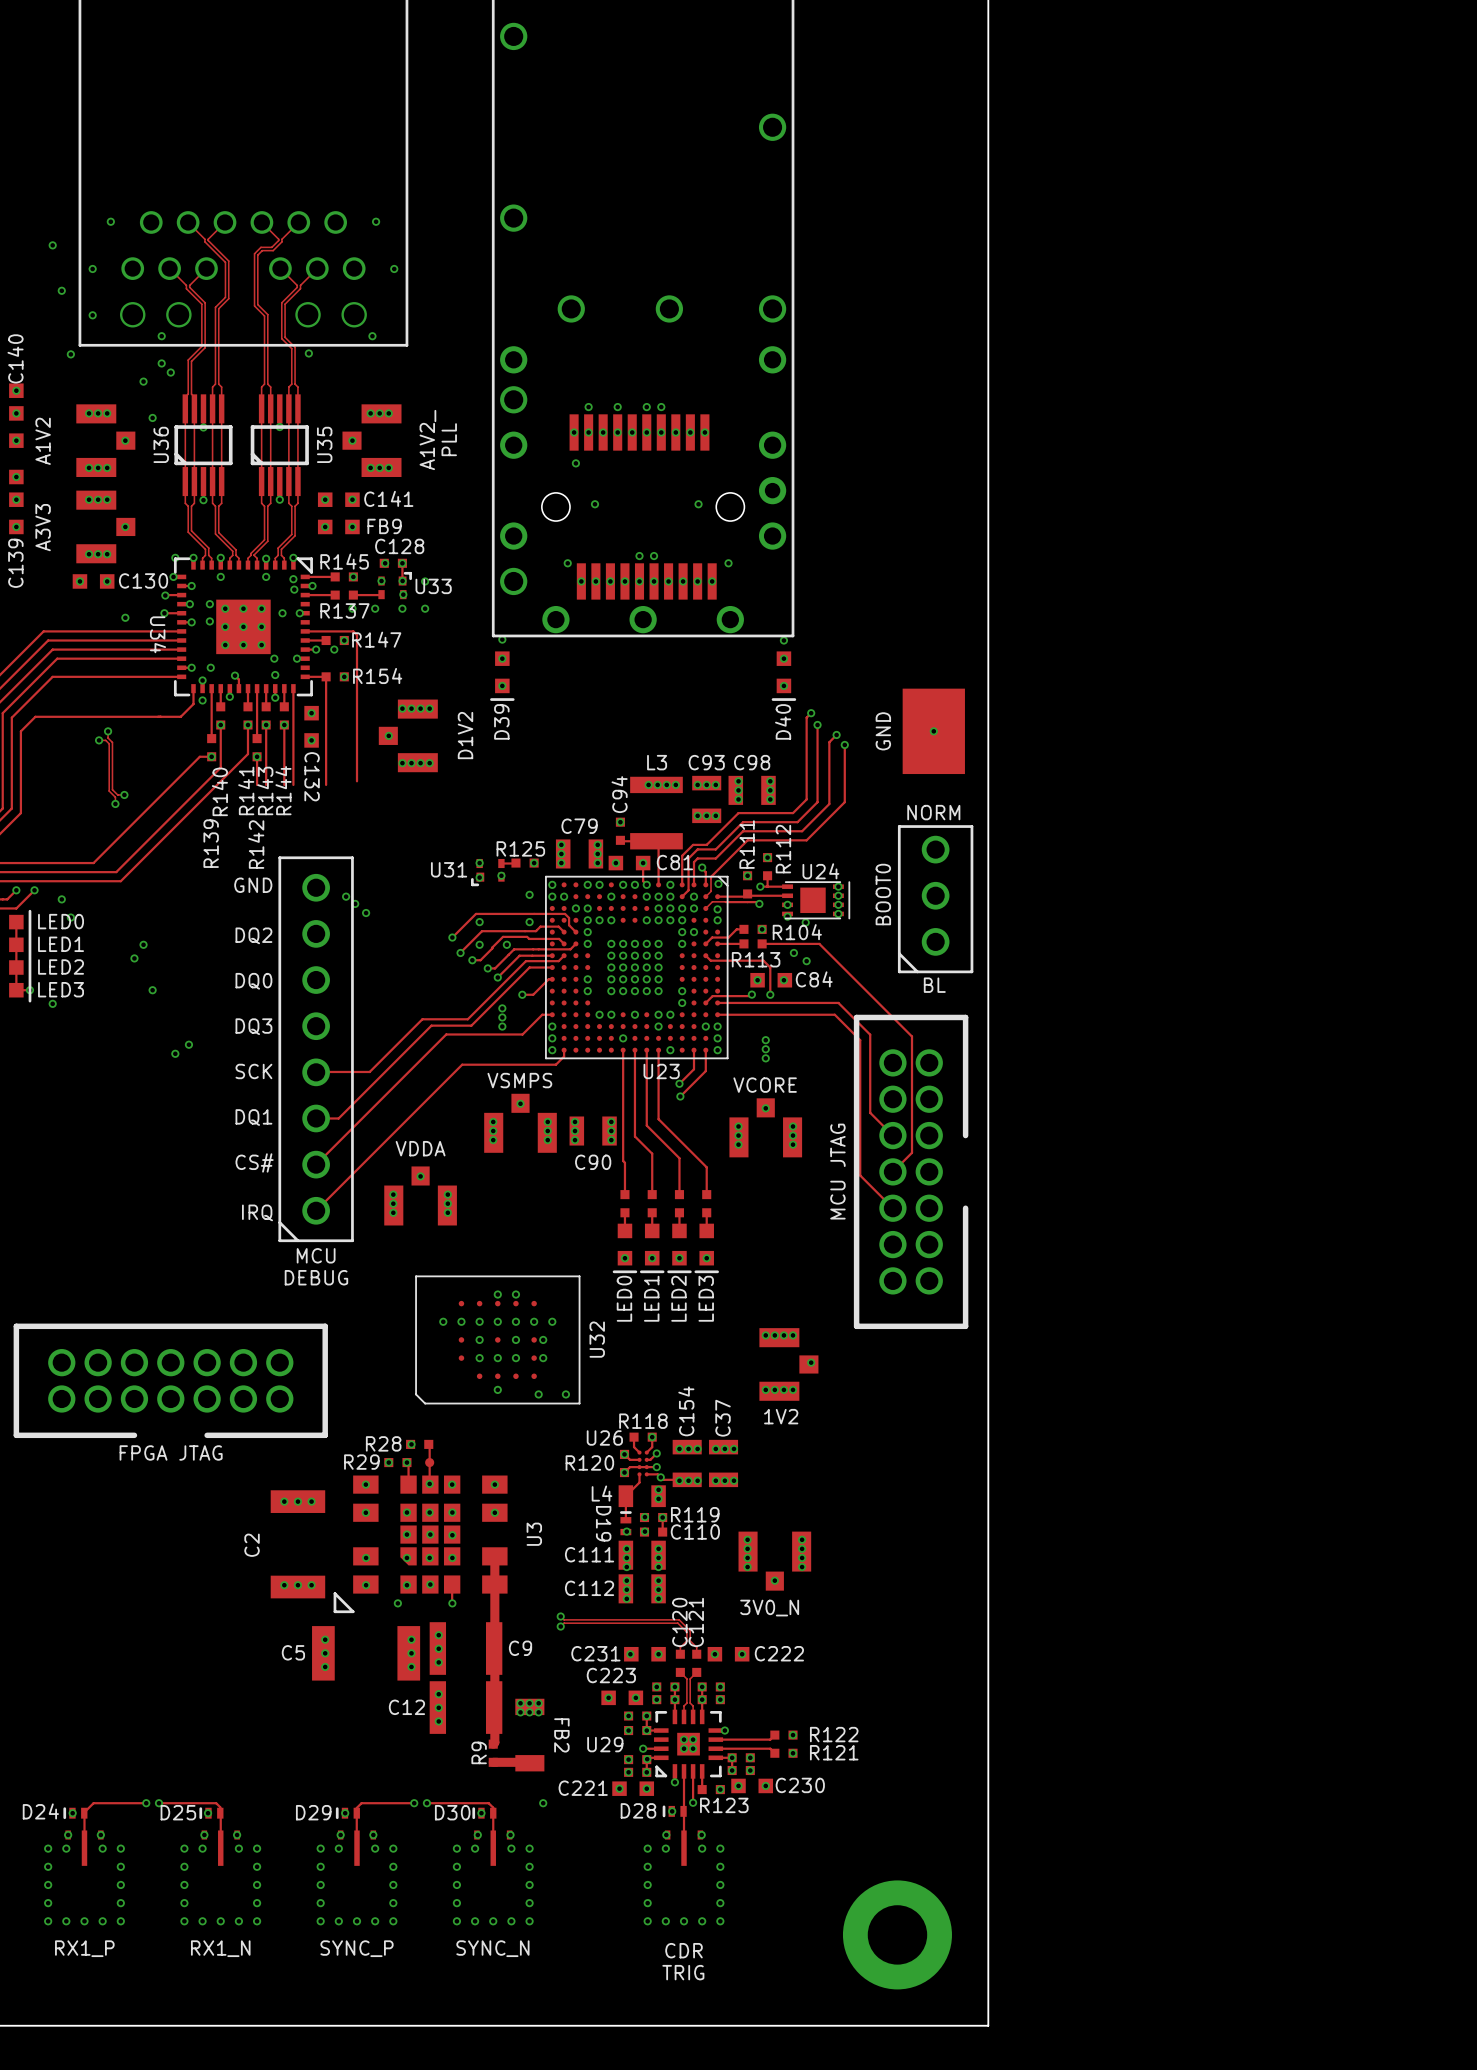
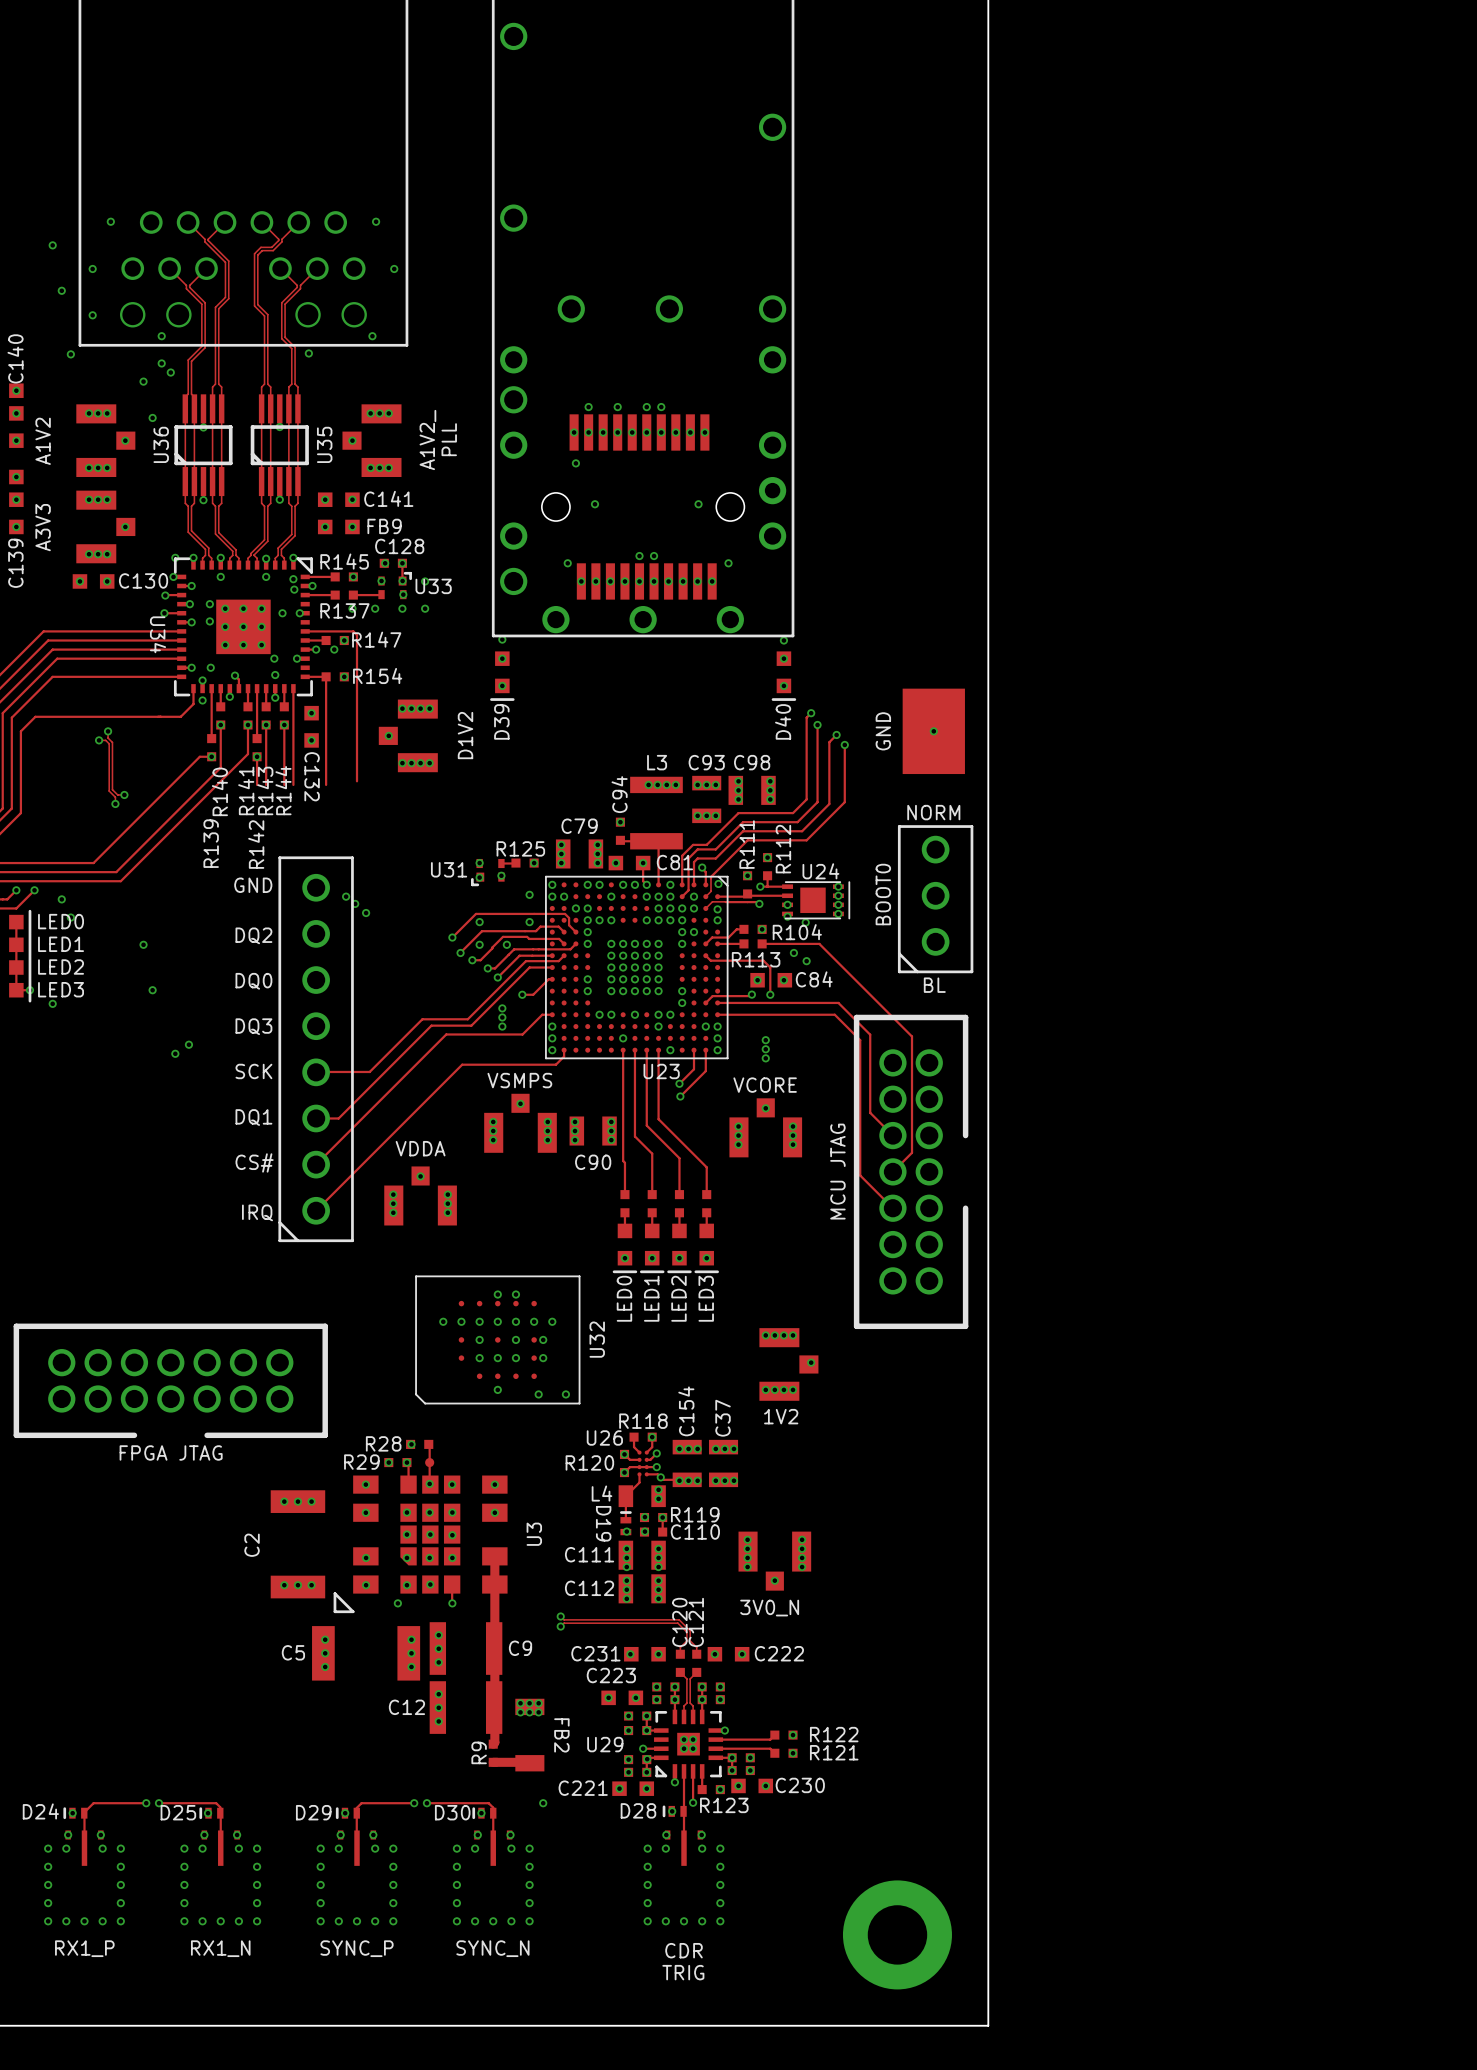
via: (125, 617) -> none
via: (134, 958) -> none
text: MCU (316, 1255) -> none
text: DEBUG (316, 1277) -> none

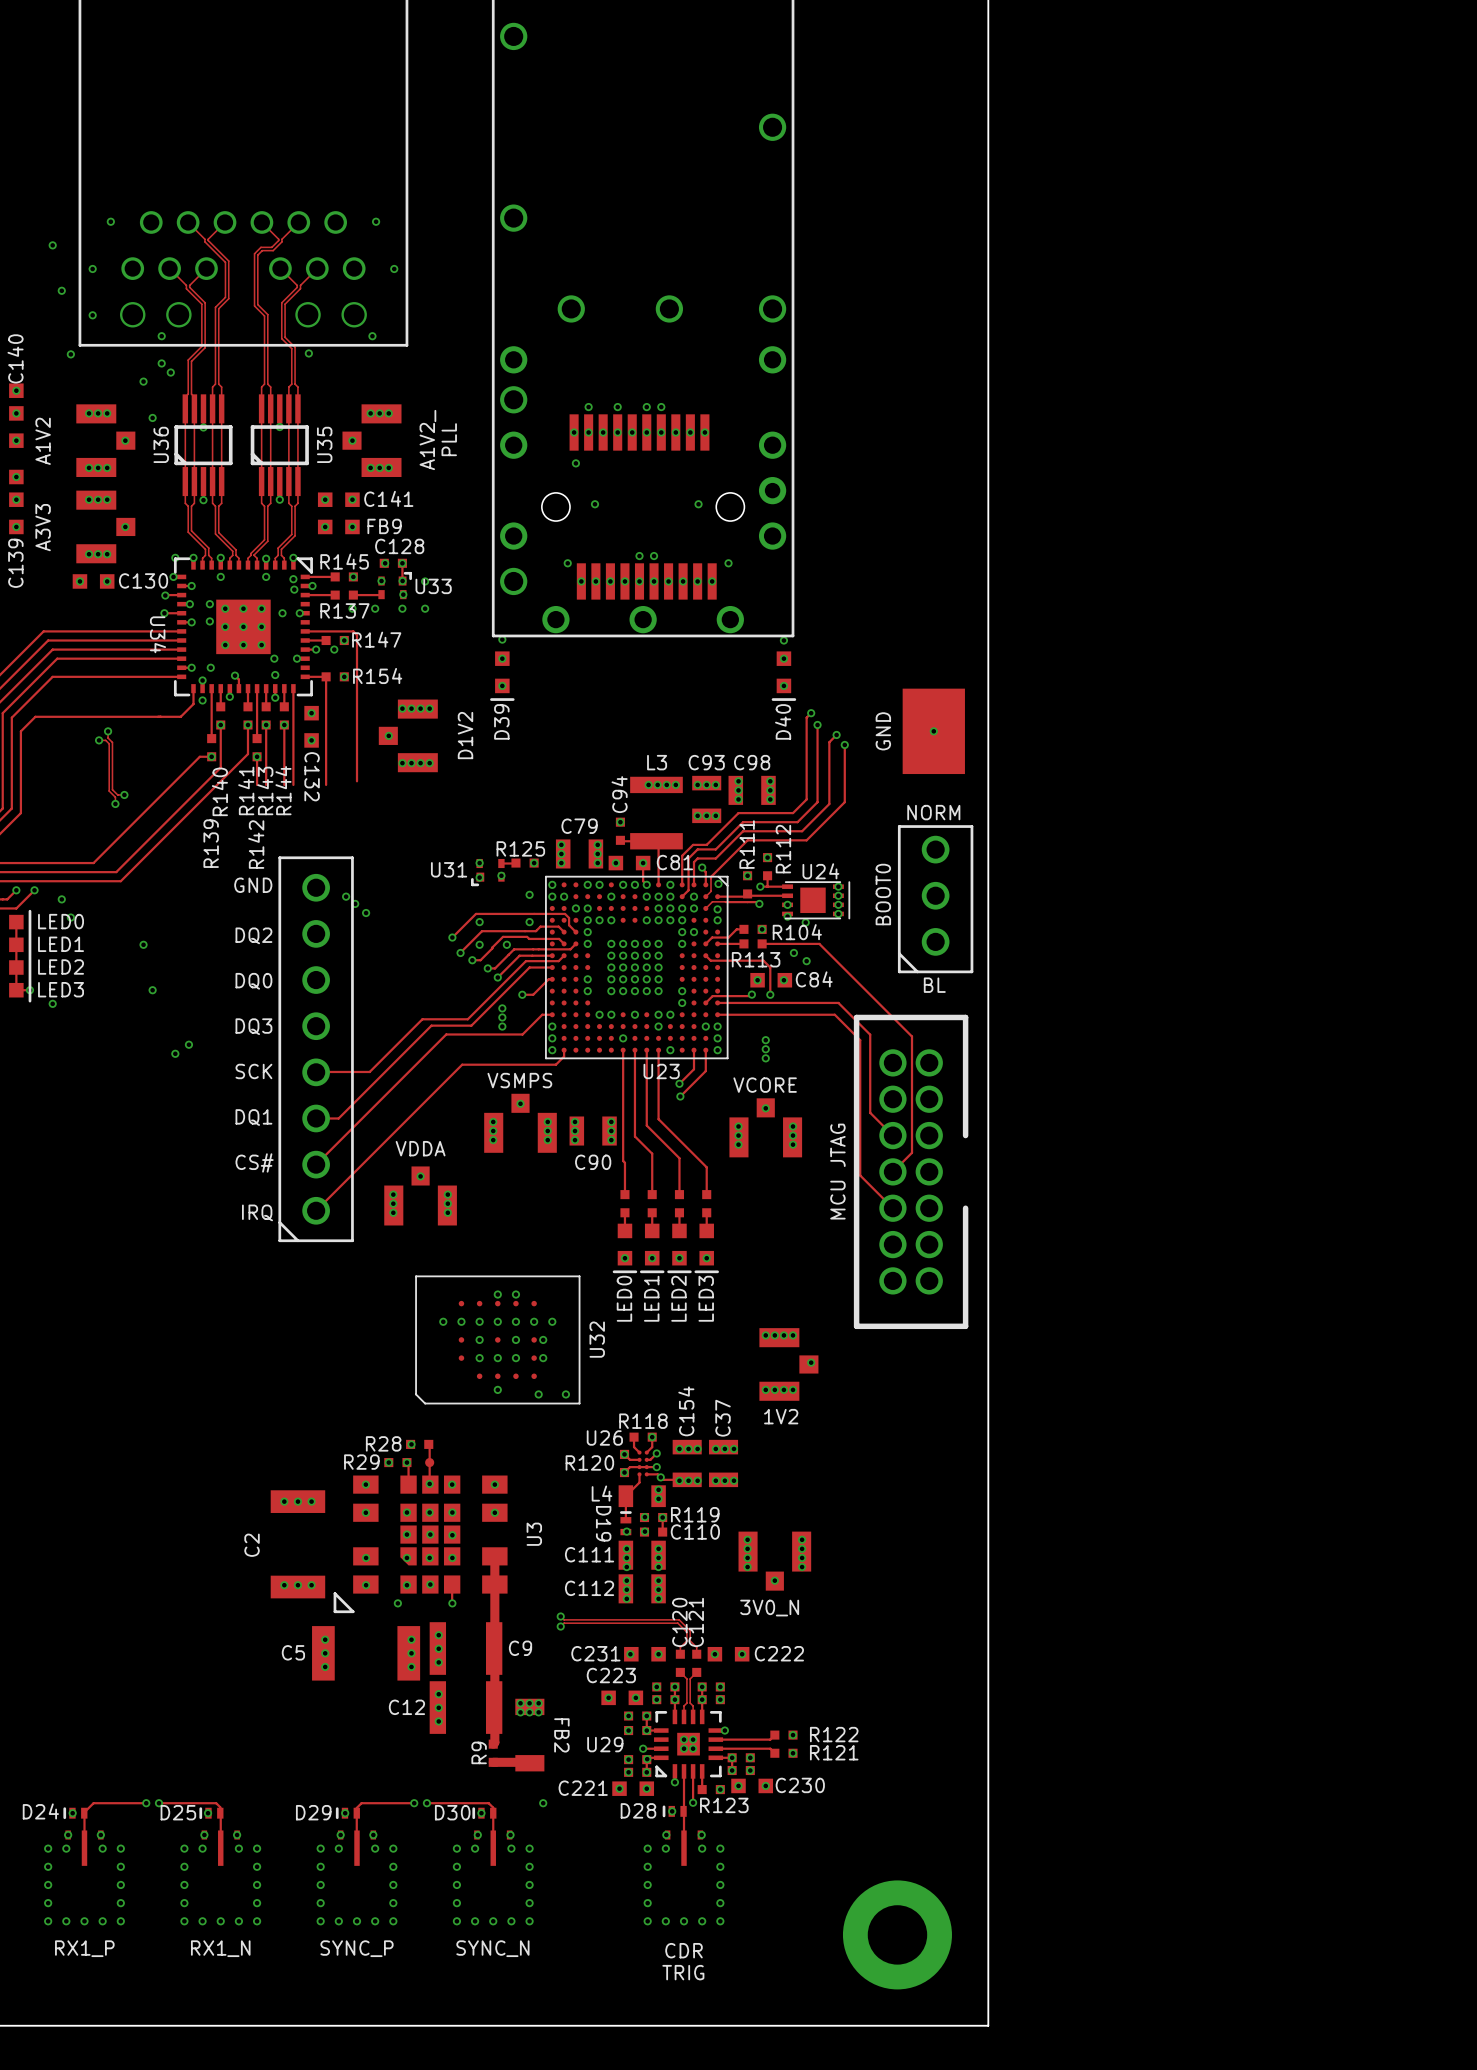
part: (170, 1380) -> none
text: FPGA JTAG (171, 1452) -> none

